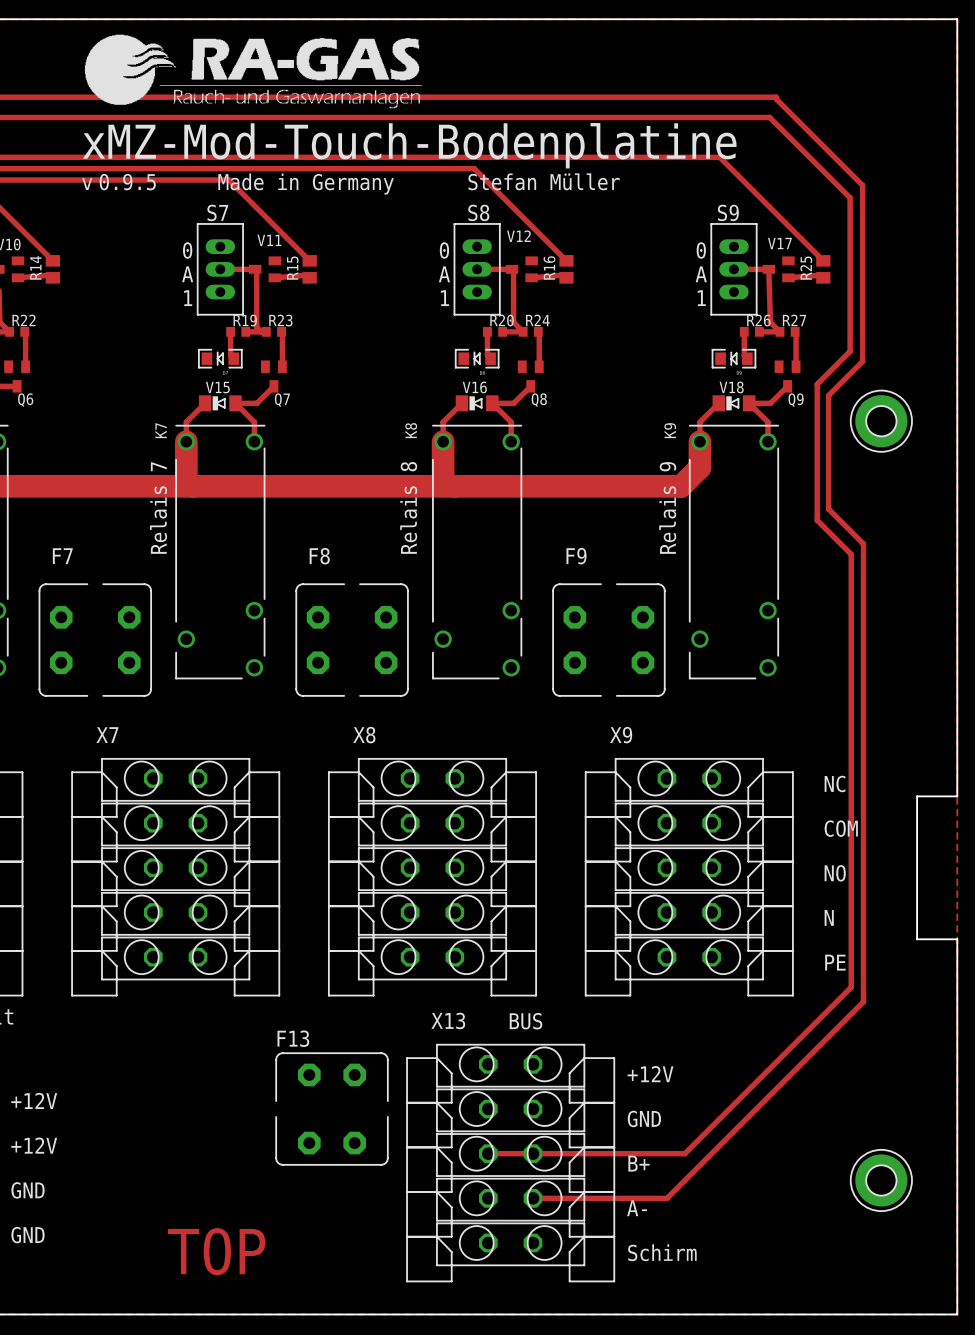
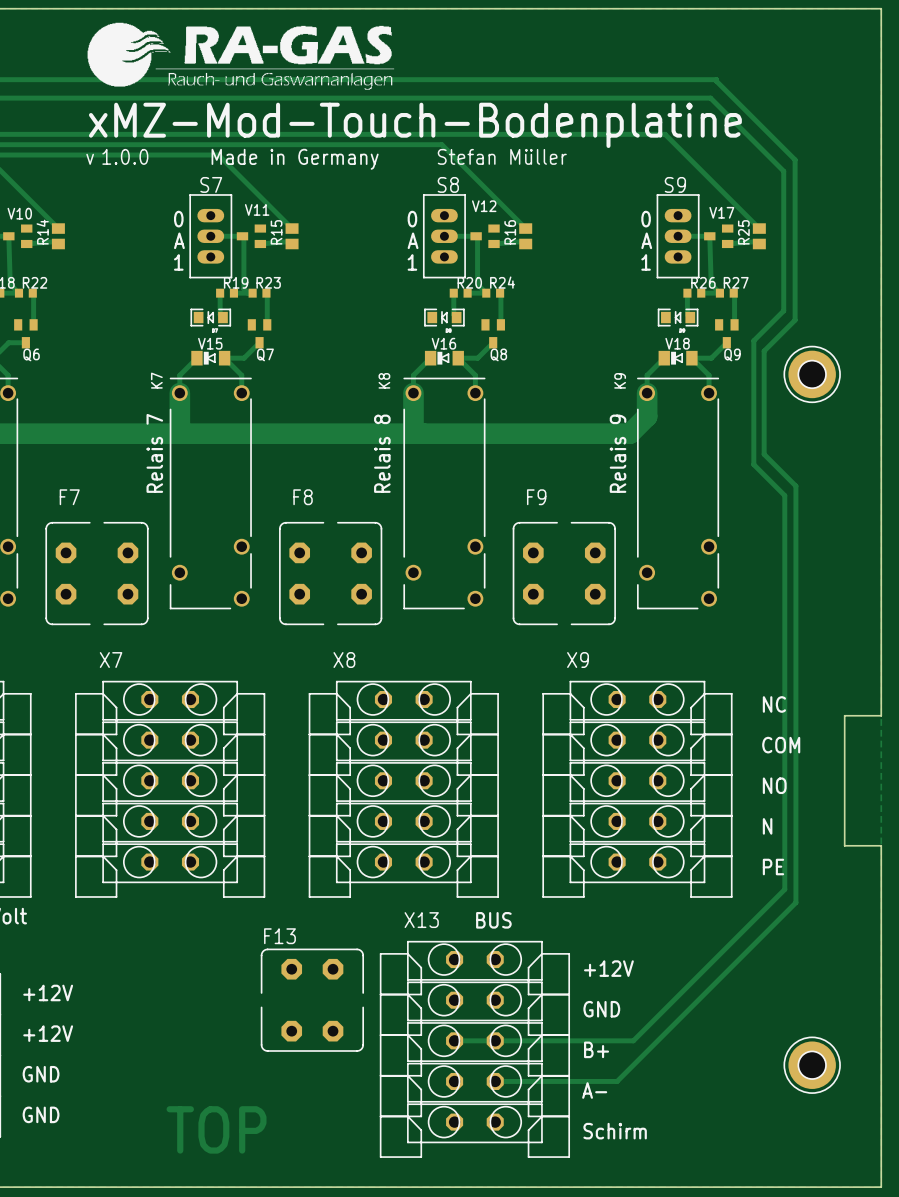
drawing shape: [82, 123, 737, 195] -> [86, 102, 742, 170]

